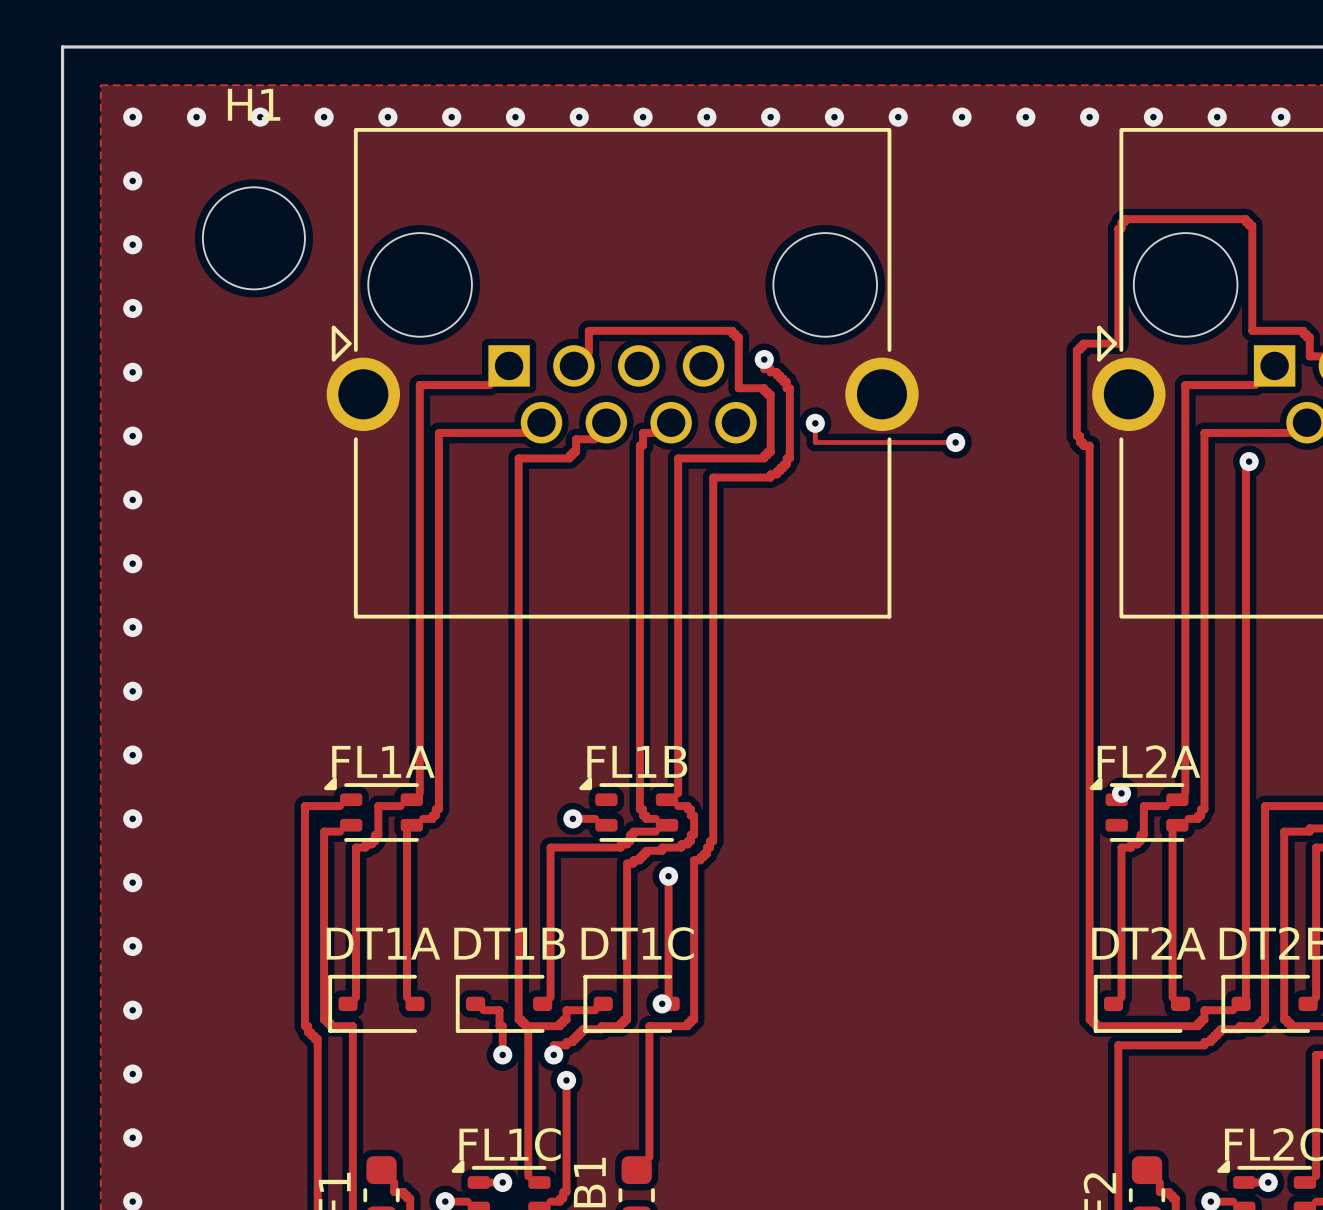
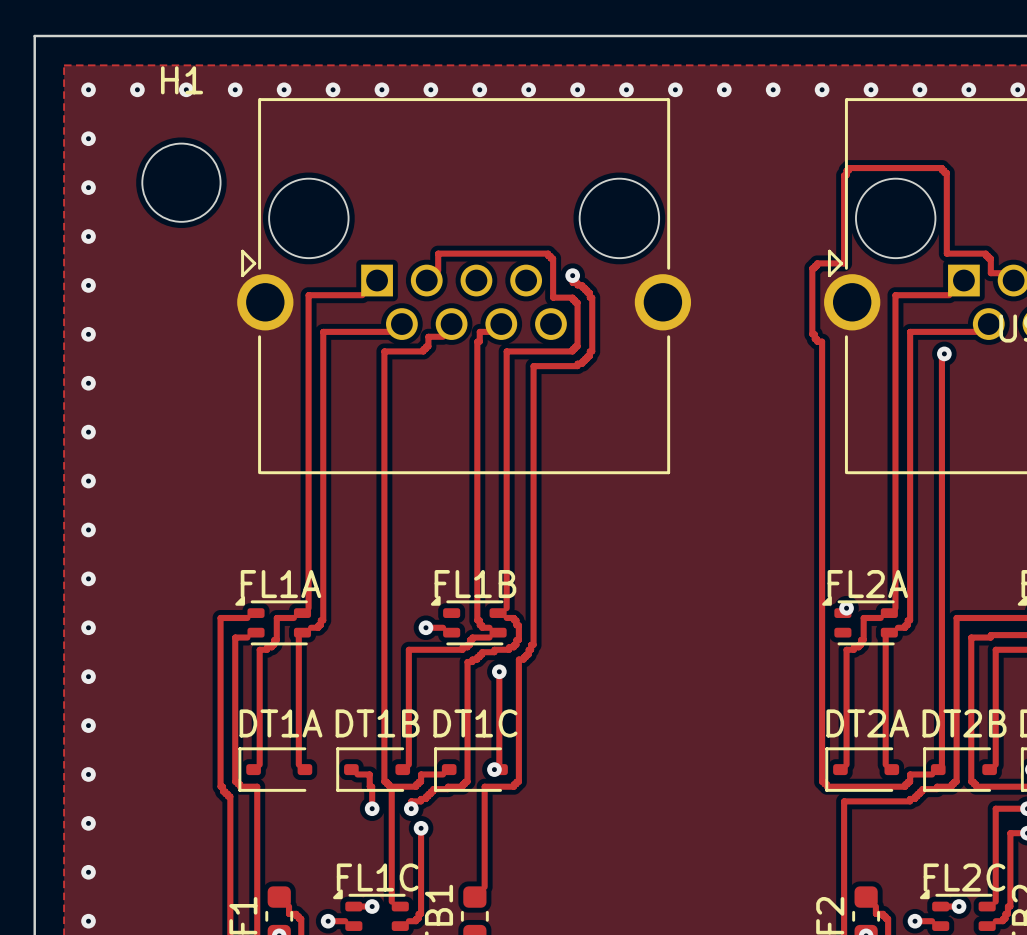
track: (815, 423) (815, 442) (955, 442) -> none
via: (815, 423) -> none
via: (955, 442) -> none

